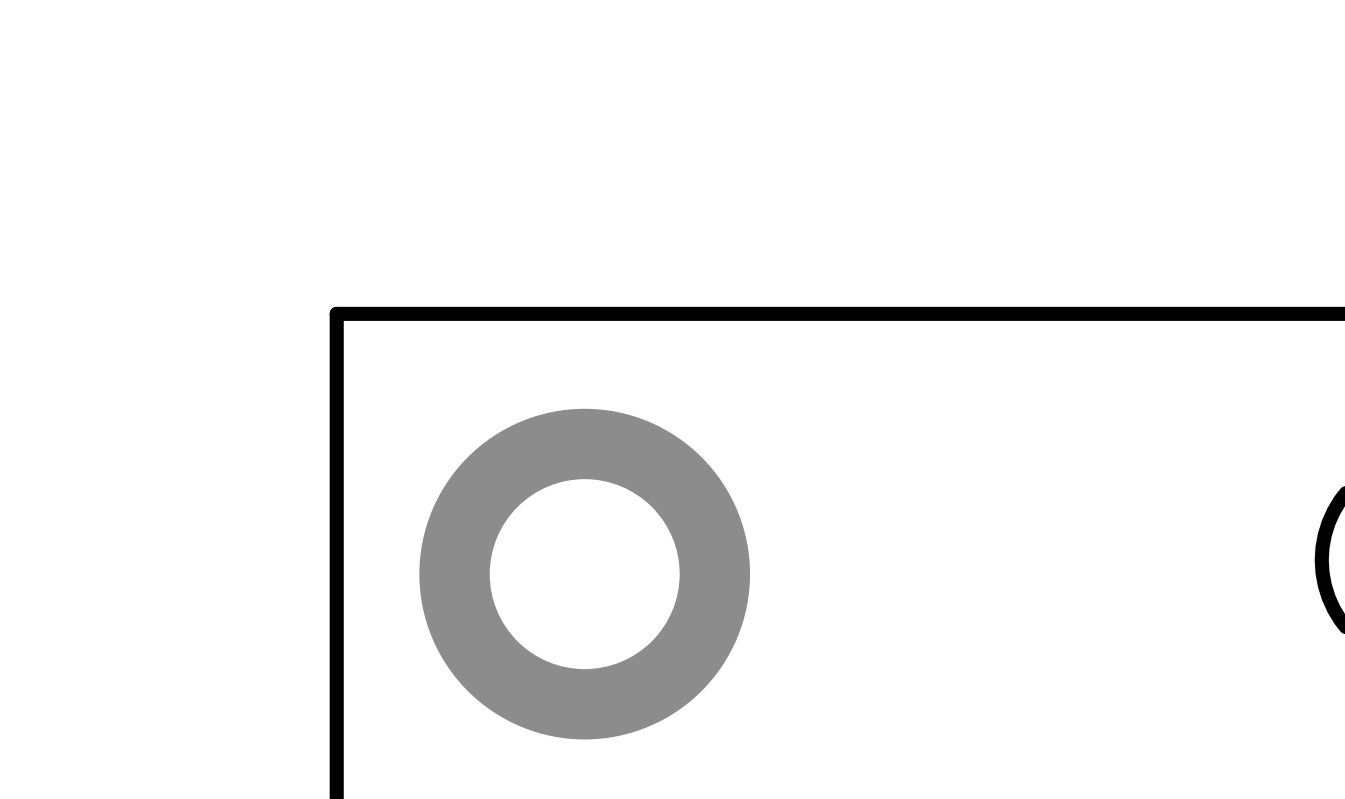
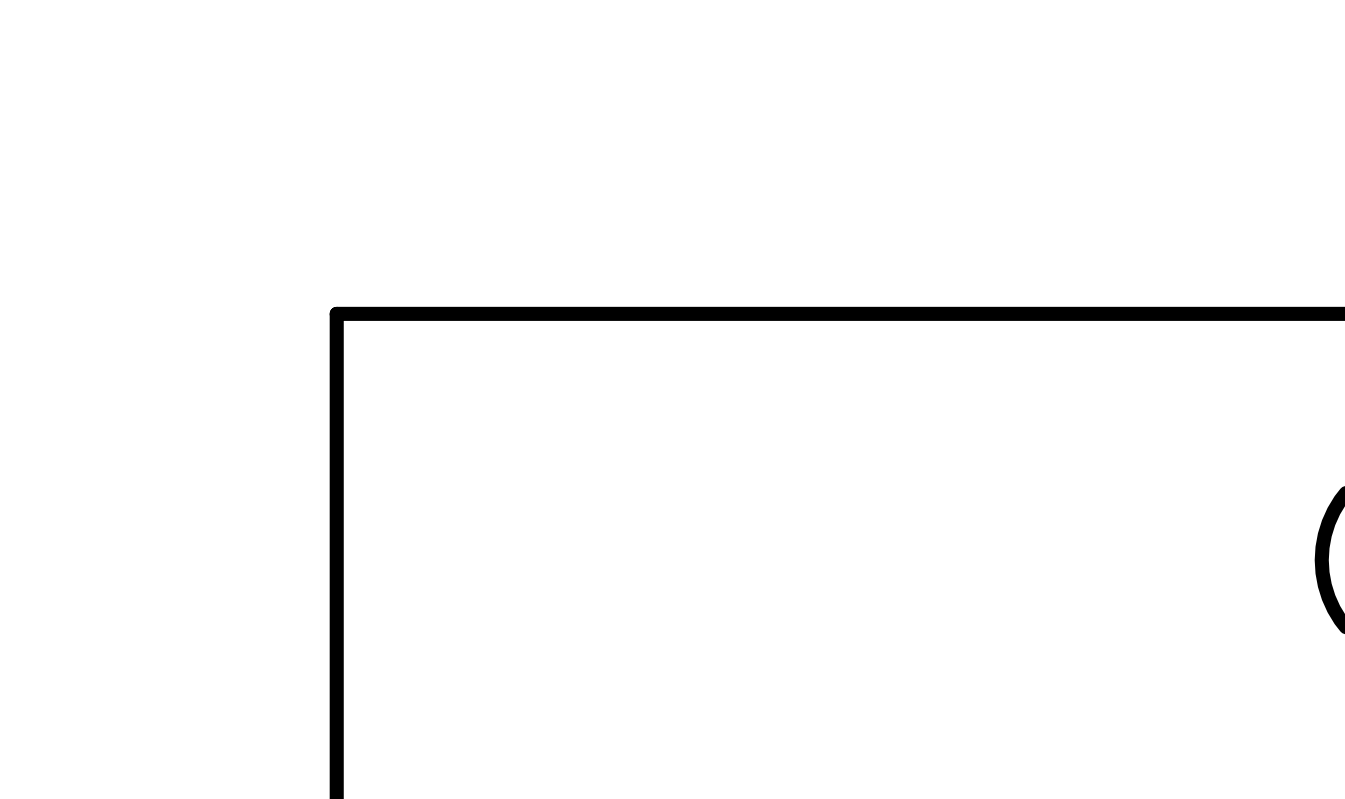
part: (584, 574) -> none

